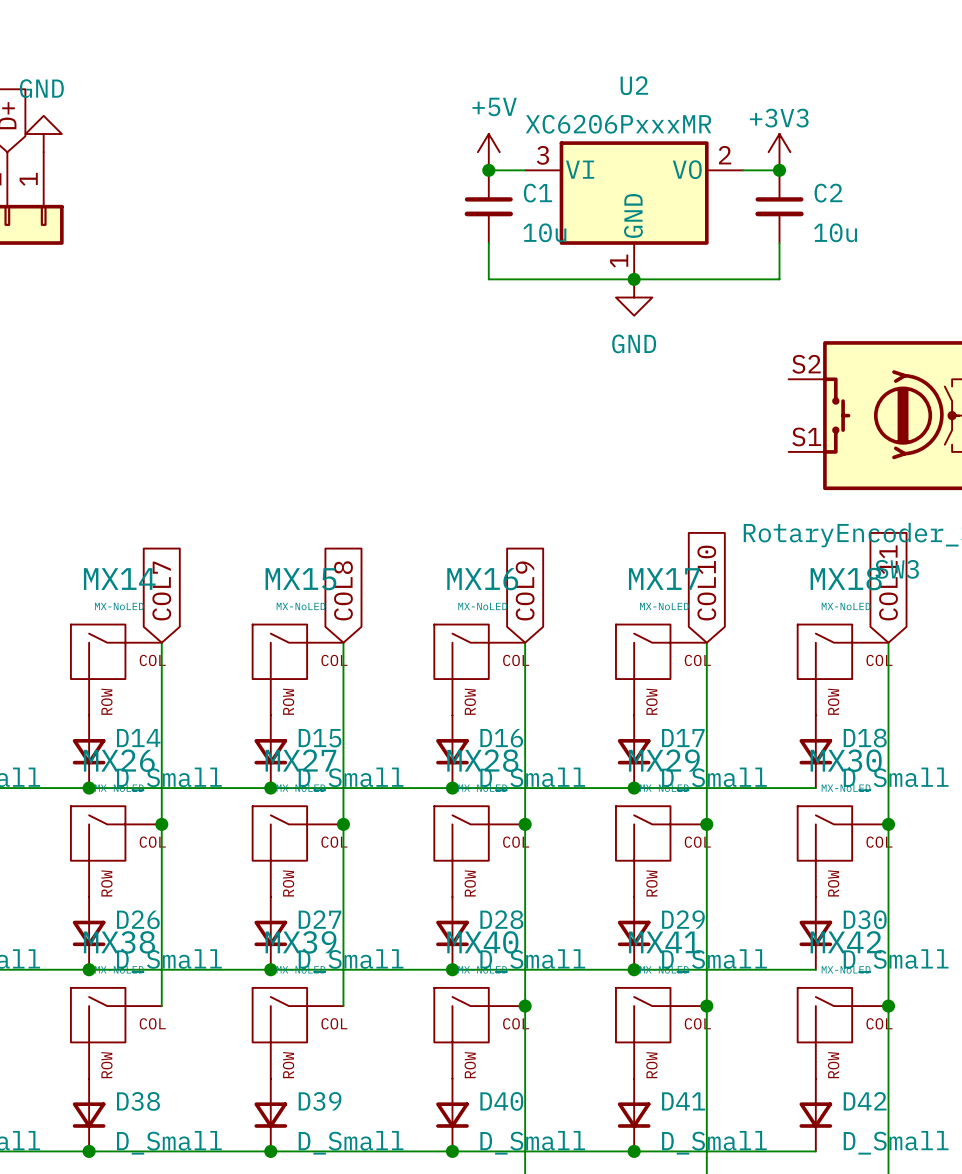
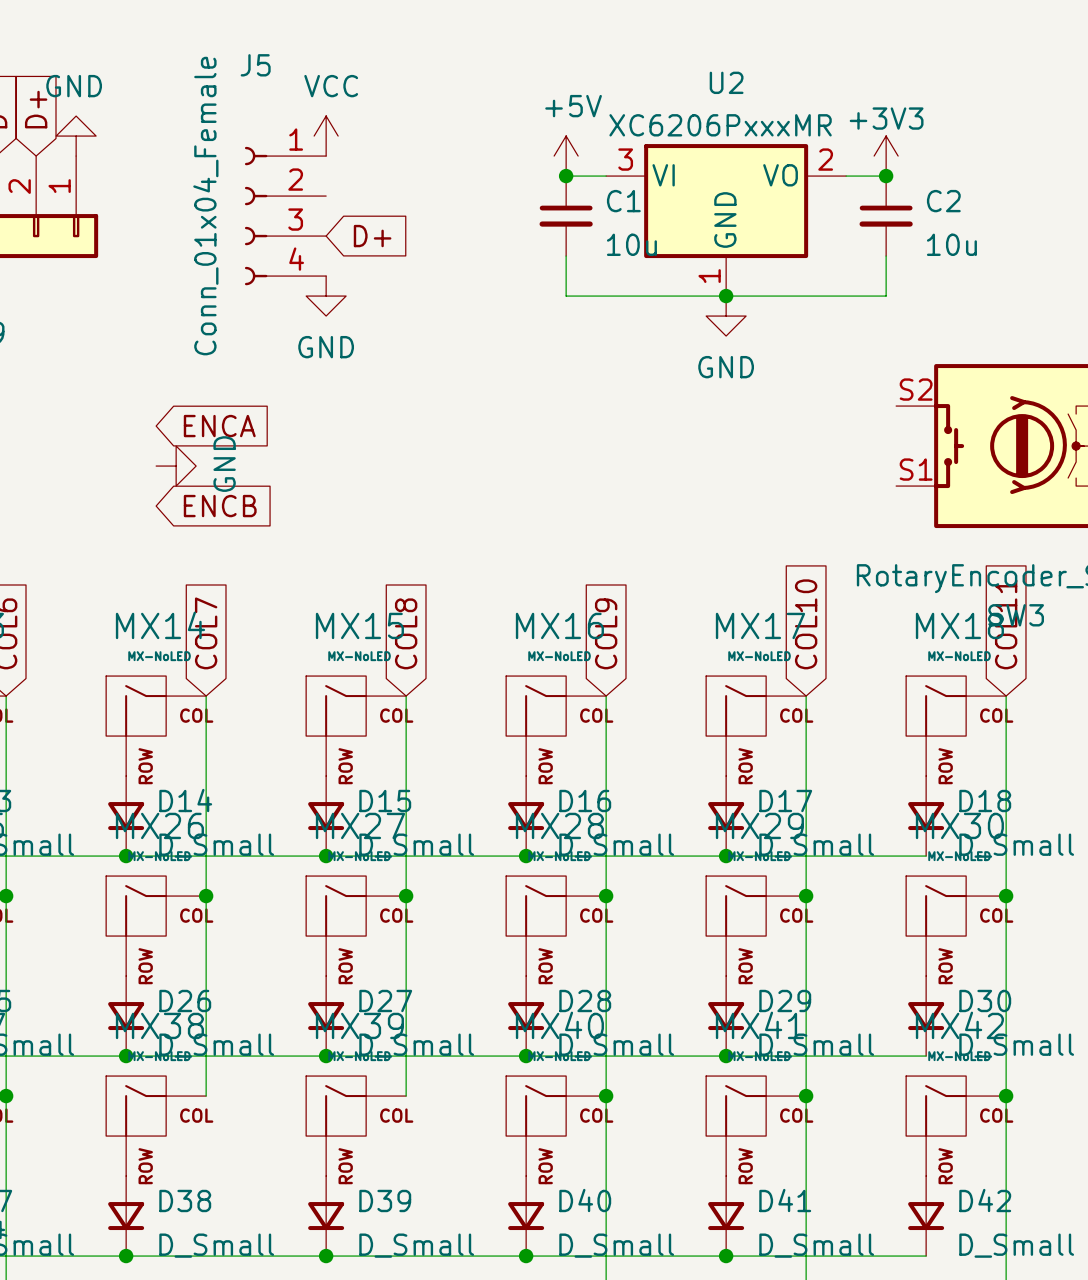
power symbol: none -> VCC (326, 136)
J5: none -> Conn_01x04_Female (285, 216)
global label: none -> D+ (372, 236)
power symbol: none -> GND (326, 296)
global label: none -> ENCA (219, 426)
power symbol: none -> GND (176, 466)
global label: none -> ENCB (220, 506)

